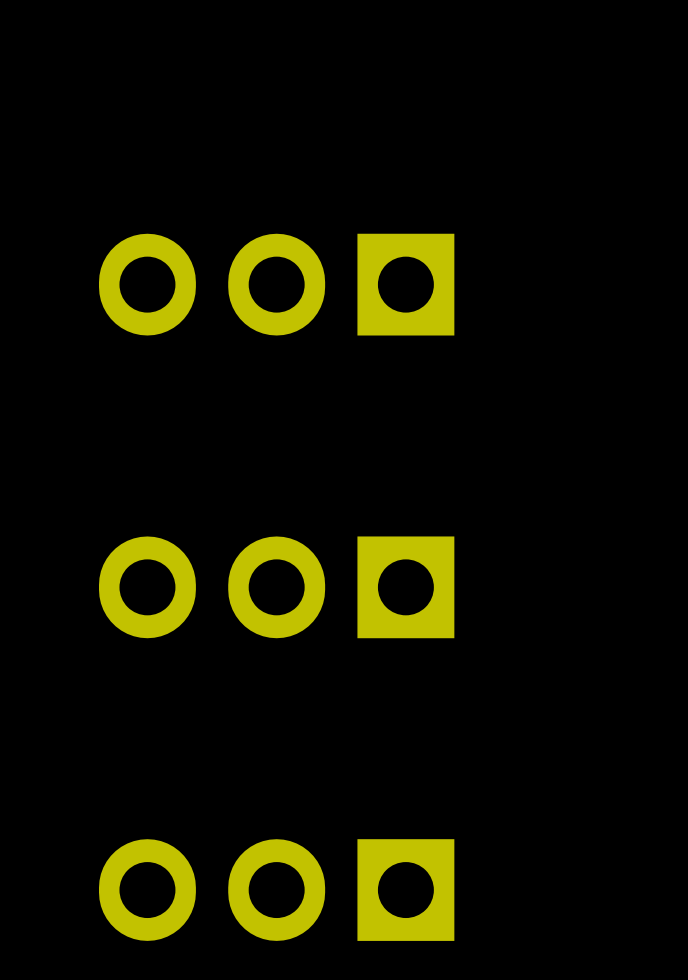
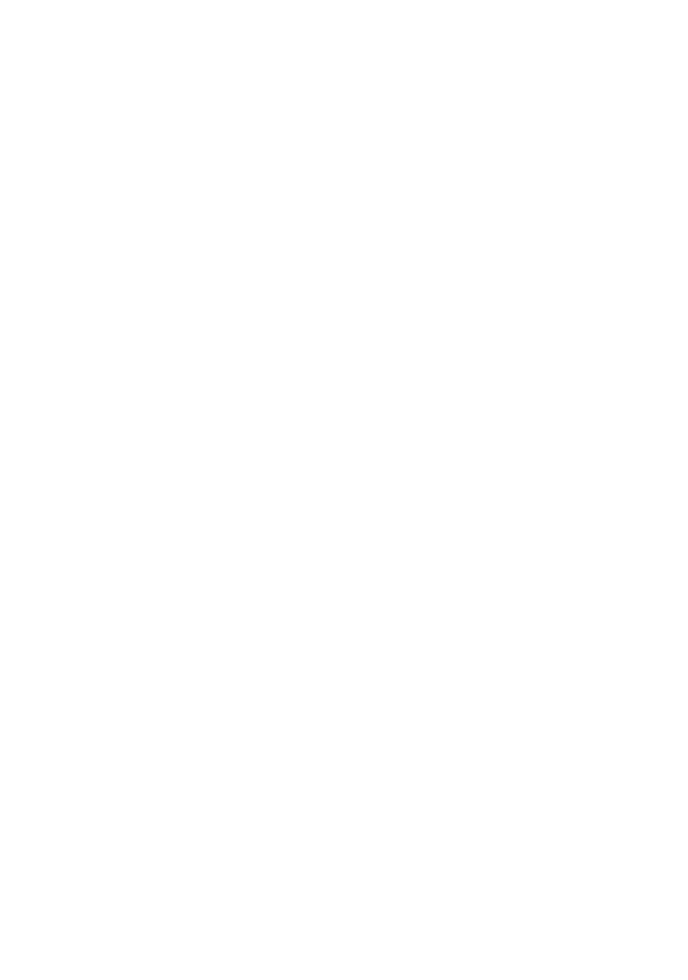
part: (276, 284) -> none
part: (276, 587) -> none
part: (276, 890) -> none

